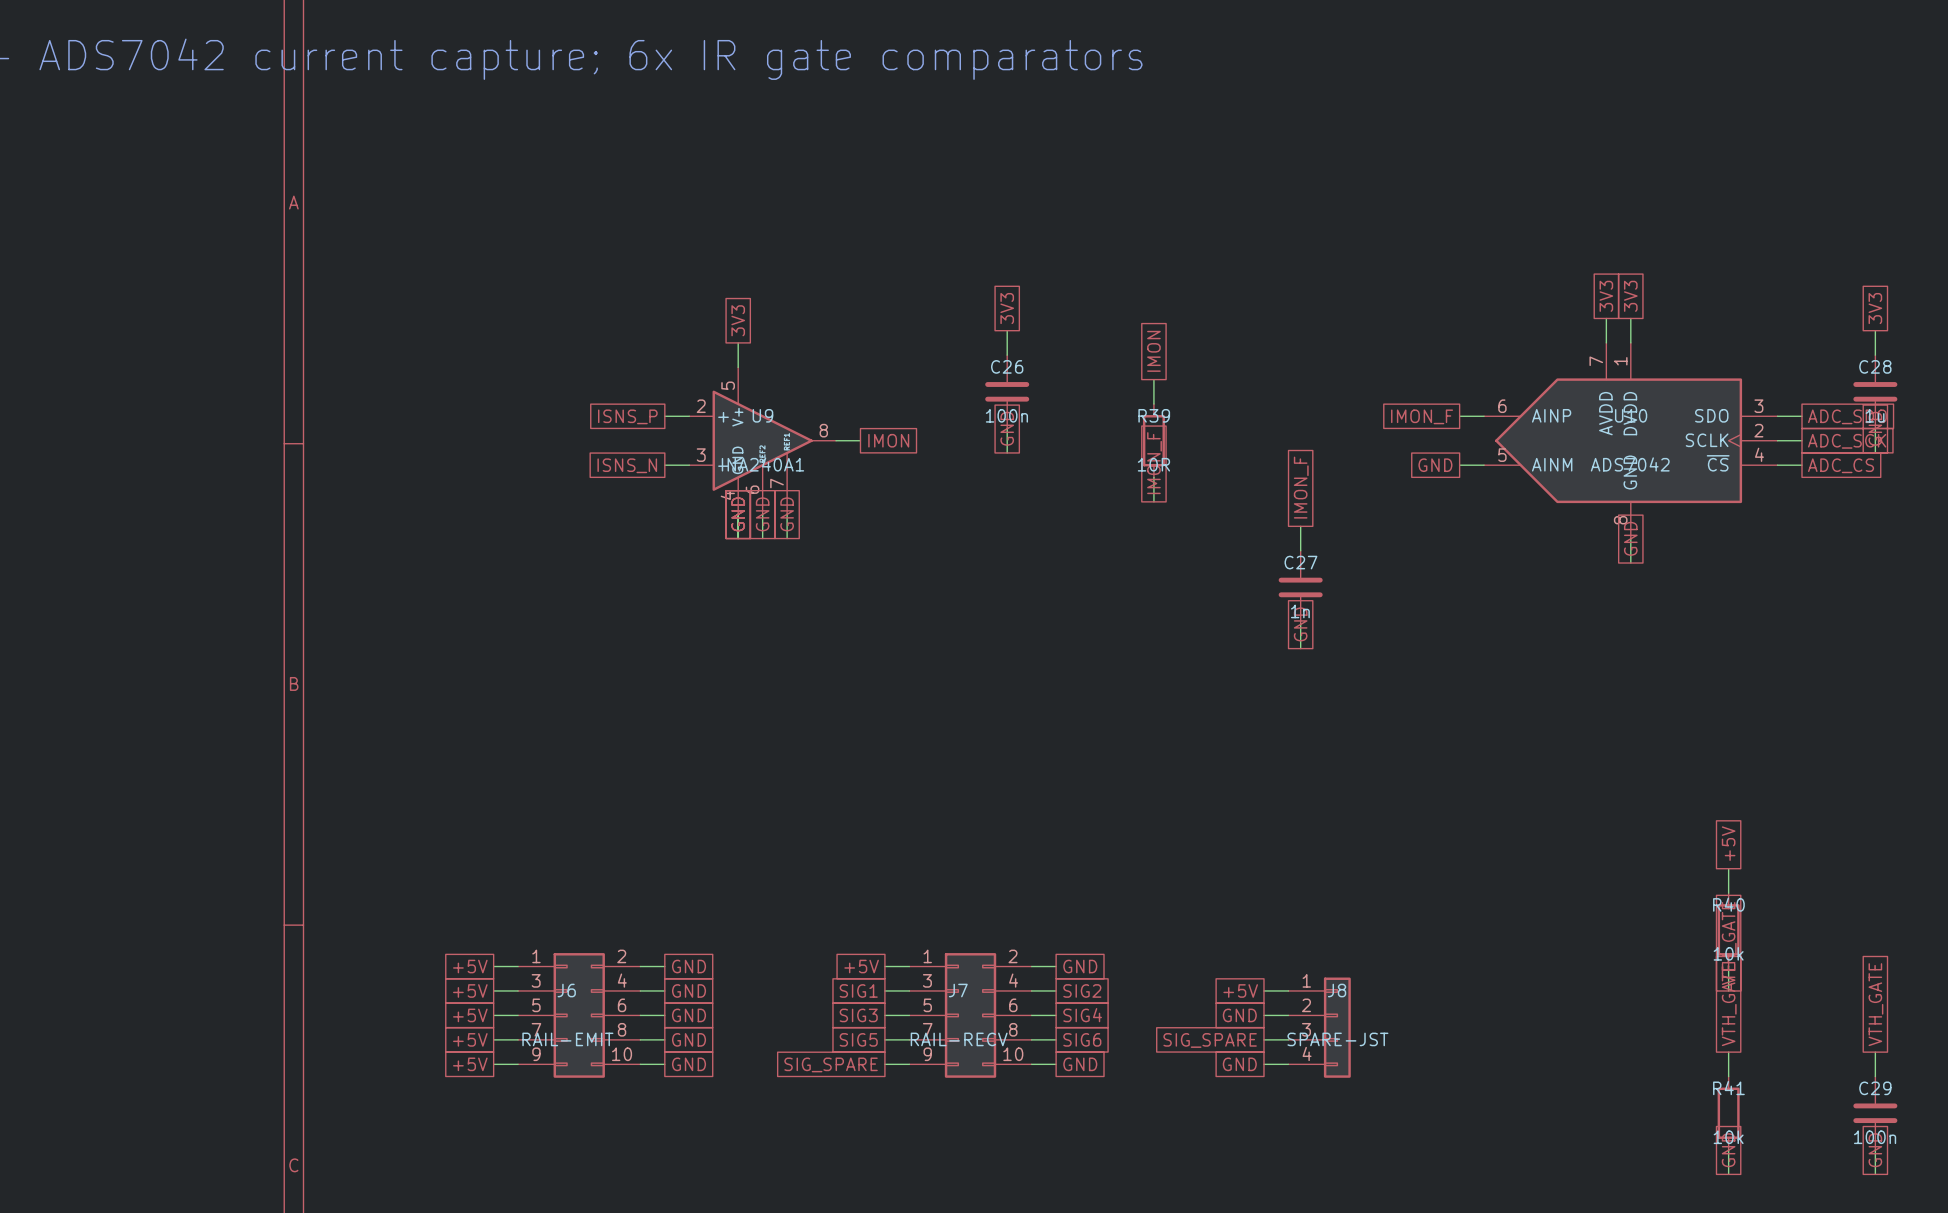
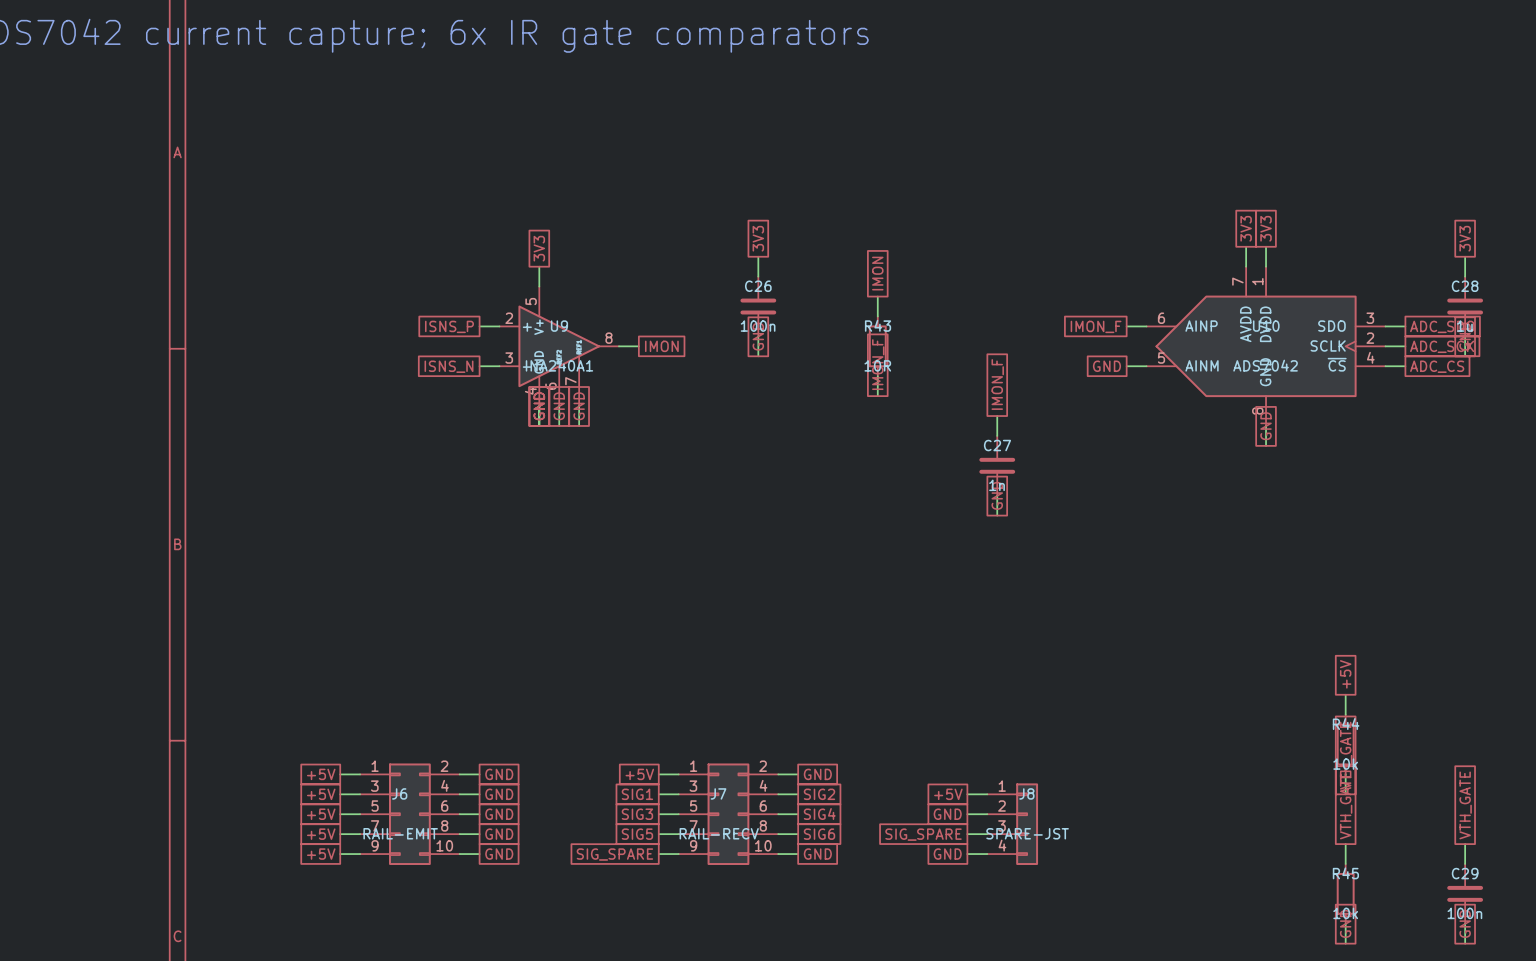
R39 name: R39 (1154, 415) -> R43 (878, 325)
R40 name: R40 (1728, 904) -> R44 (1346, 724)
R41 name: R41 (1728, 1088) -> R45 (1345, 873)

